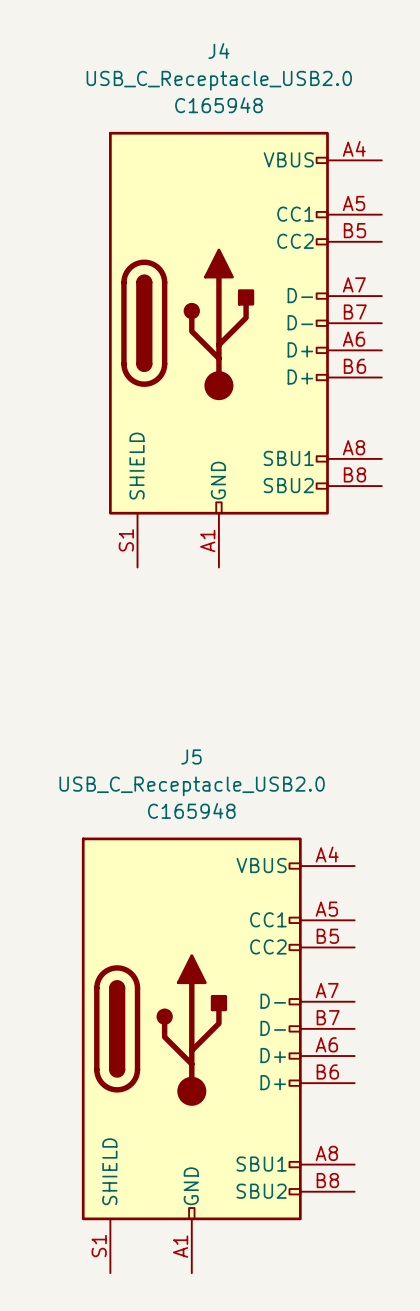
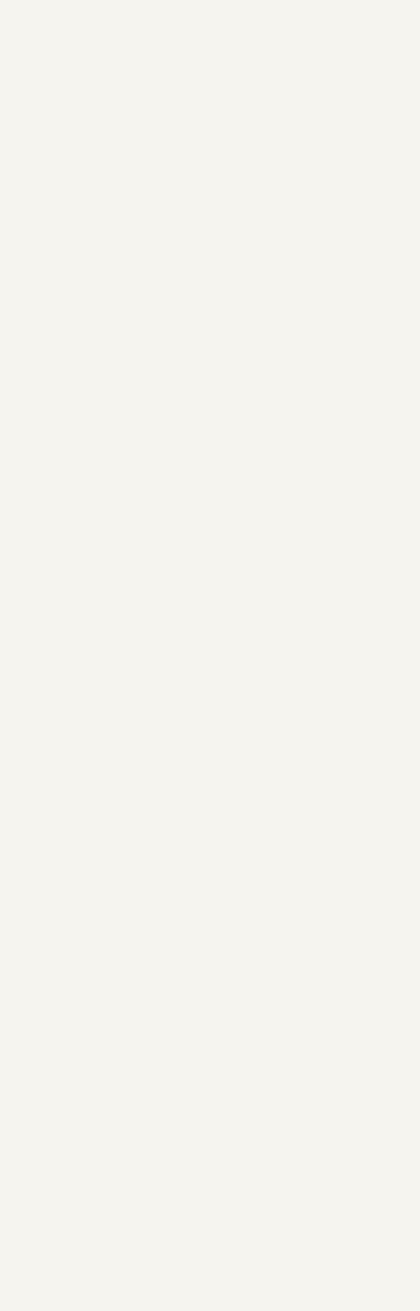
J4: USB_C_Receptacle_USB2.0 (245, 349) -> none
J5: USB_C_Receptacle_USB2.0 (218, 1055) -> none

